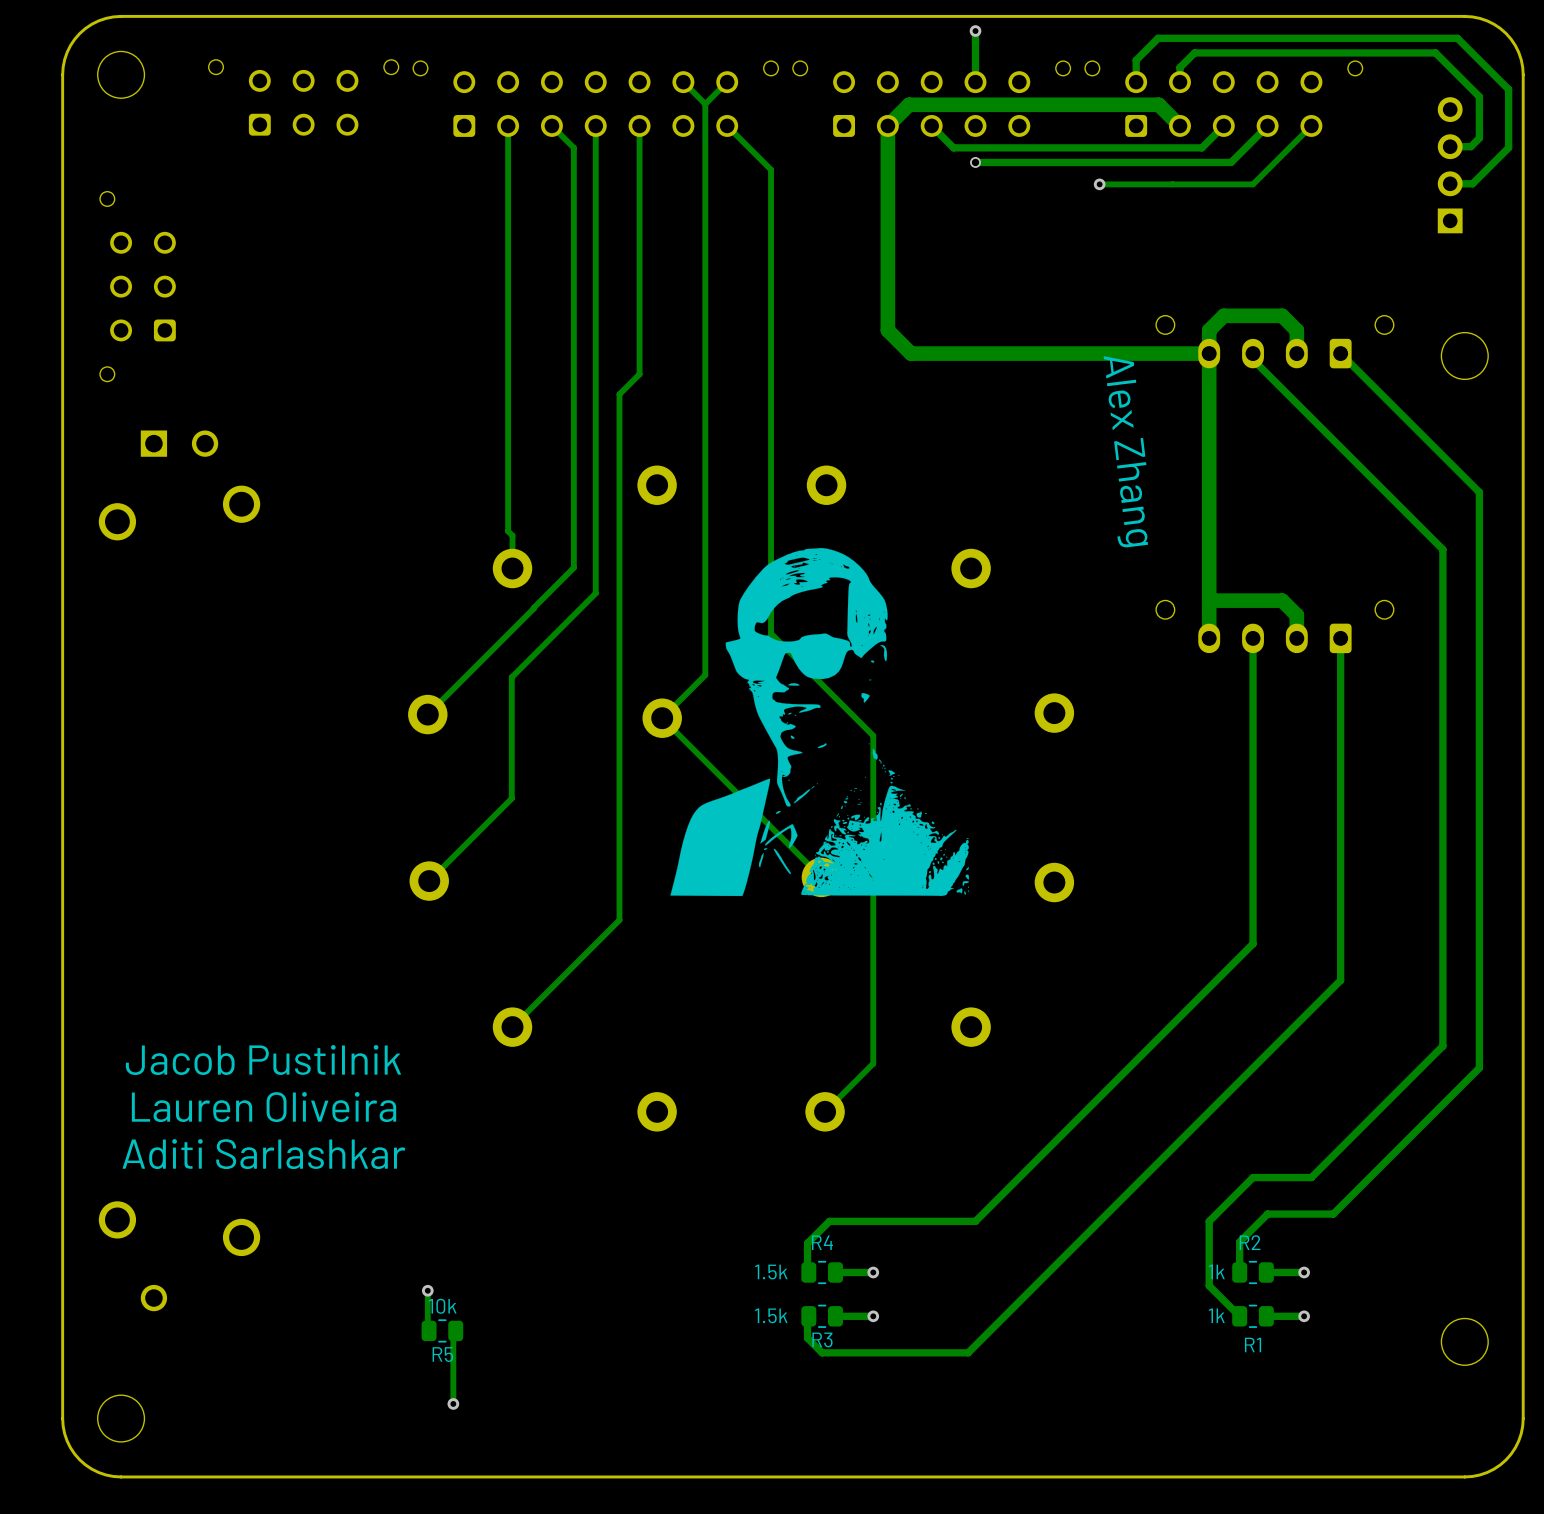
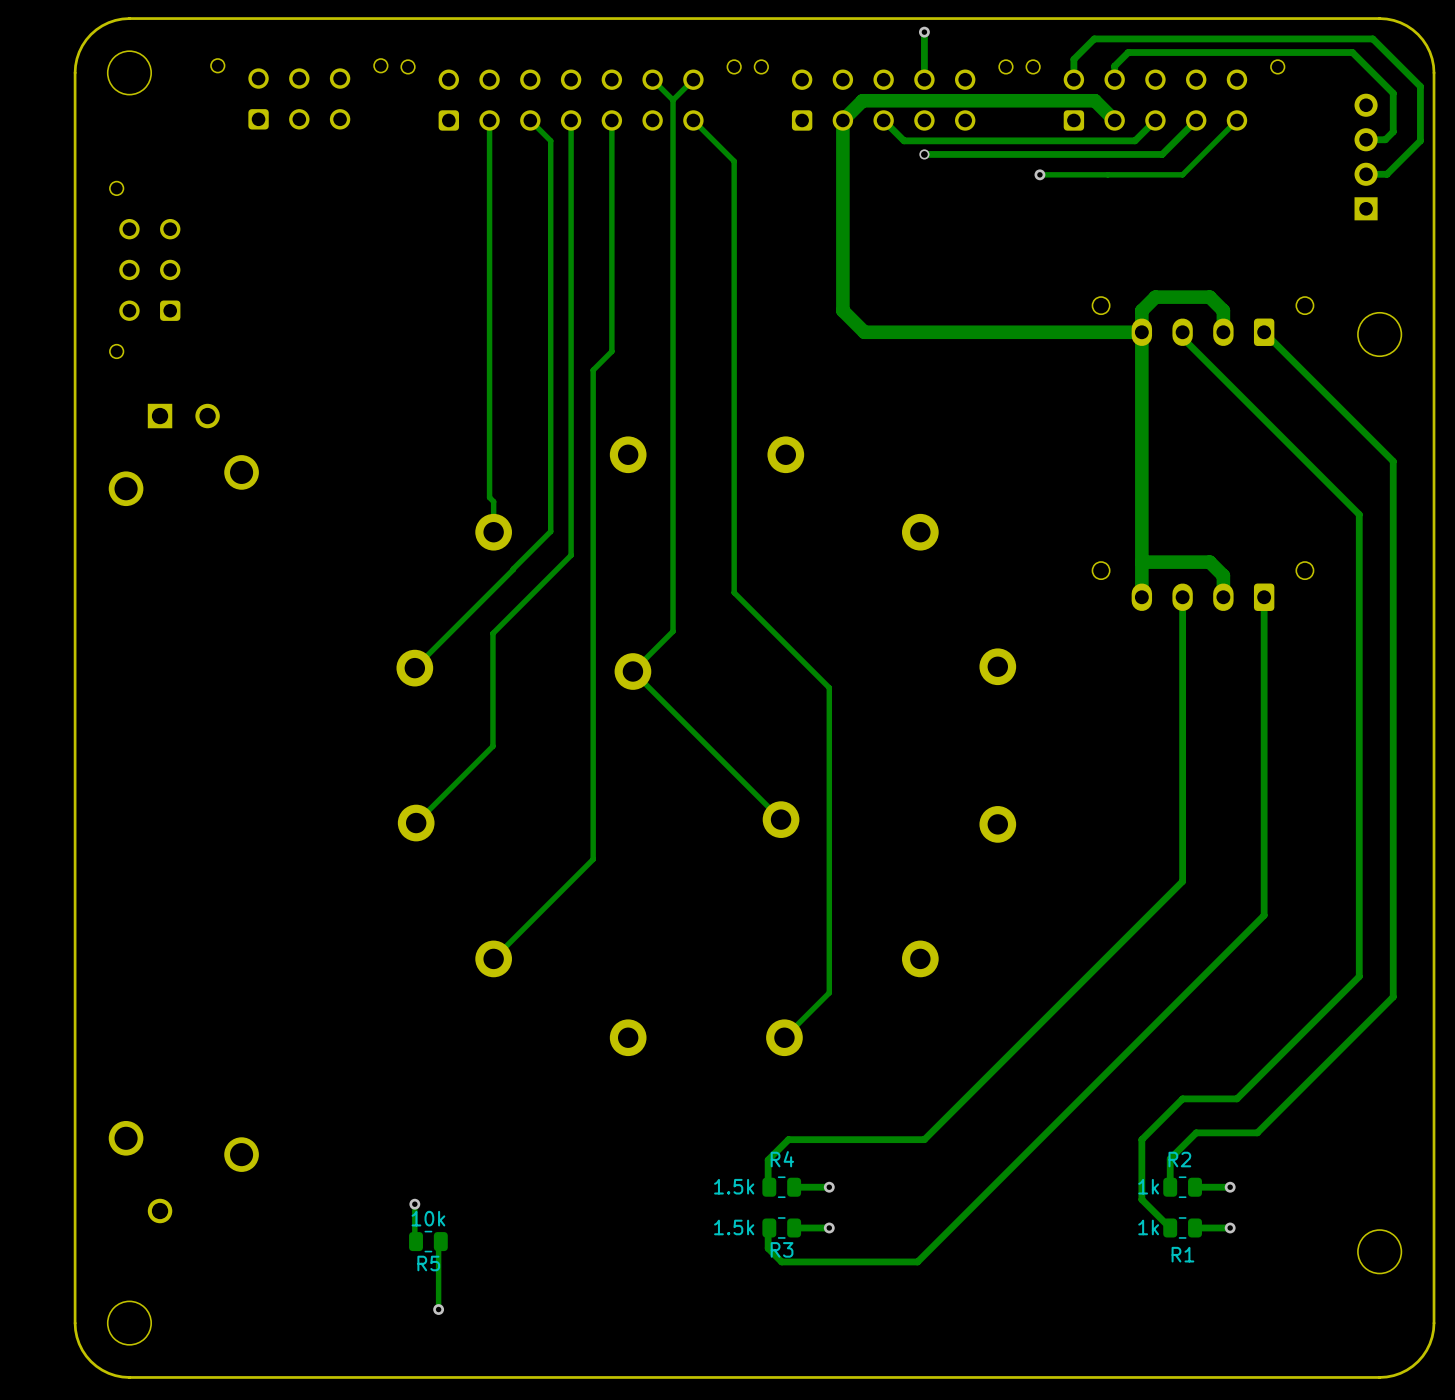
text: Alex Zhang (1125, 452) -> none
drawing: [670, 548, 969, 897] -> none
text: Jacob Pustilnik (263, 1060) -> none
text: Lauren Oliveira (264, 1107) -> none
text: Aditi Sarlashkar (263, 1154) -> none

